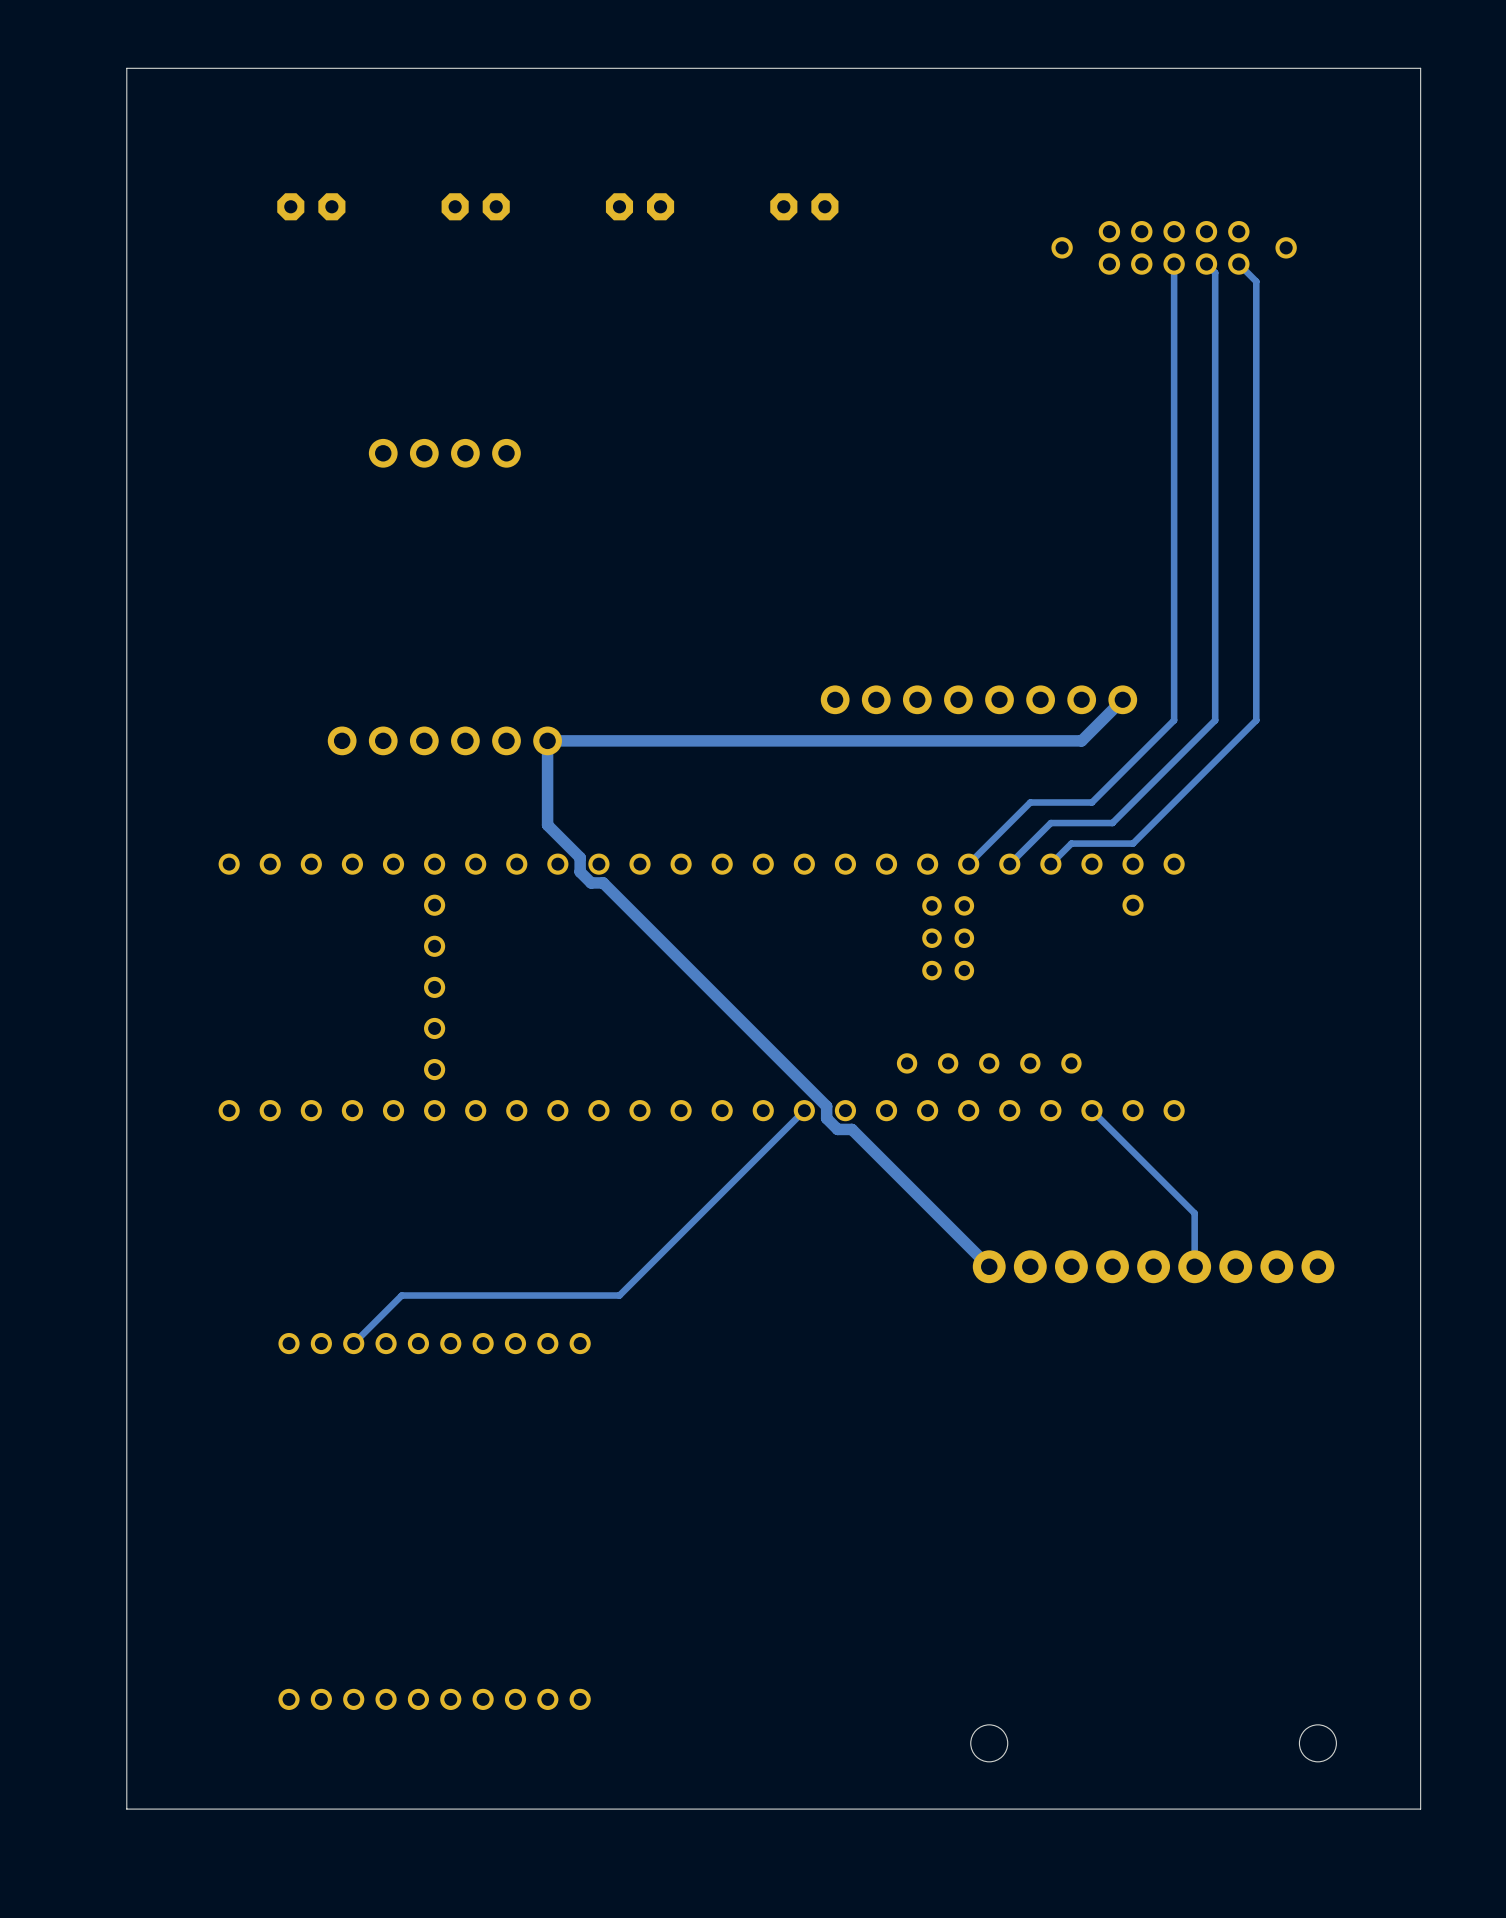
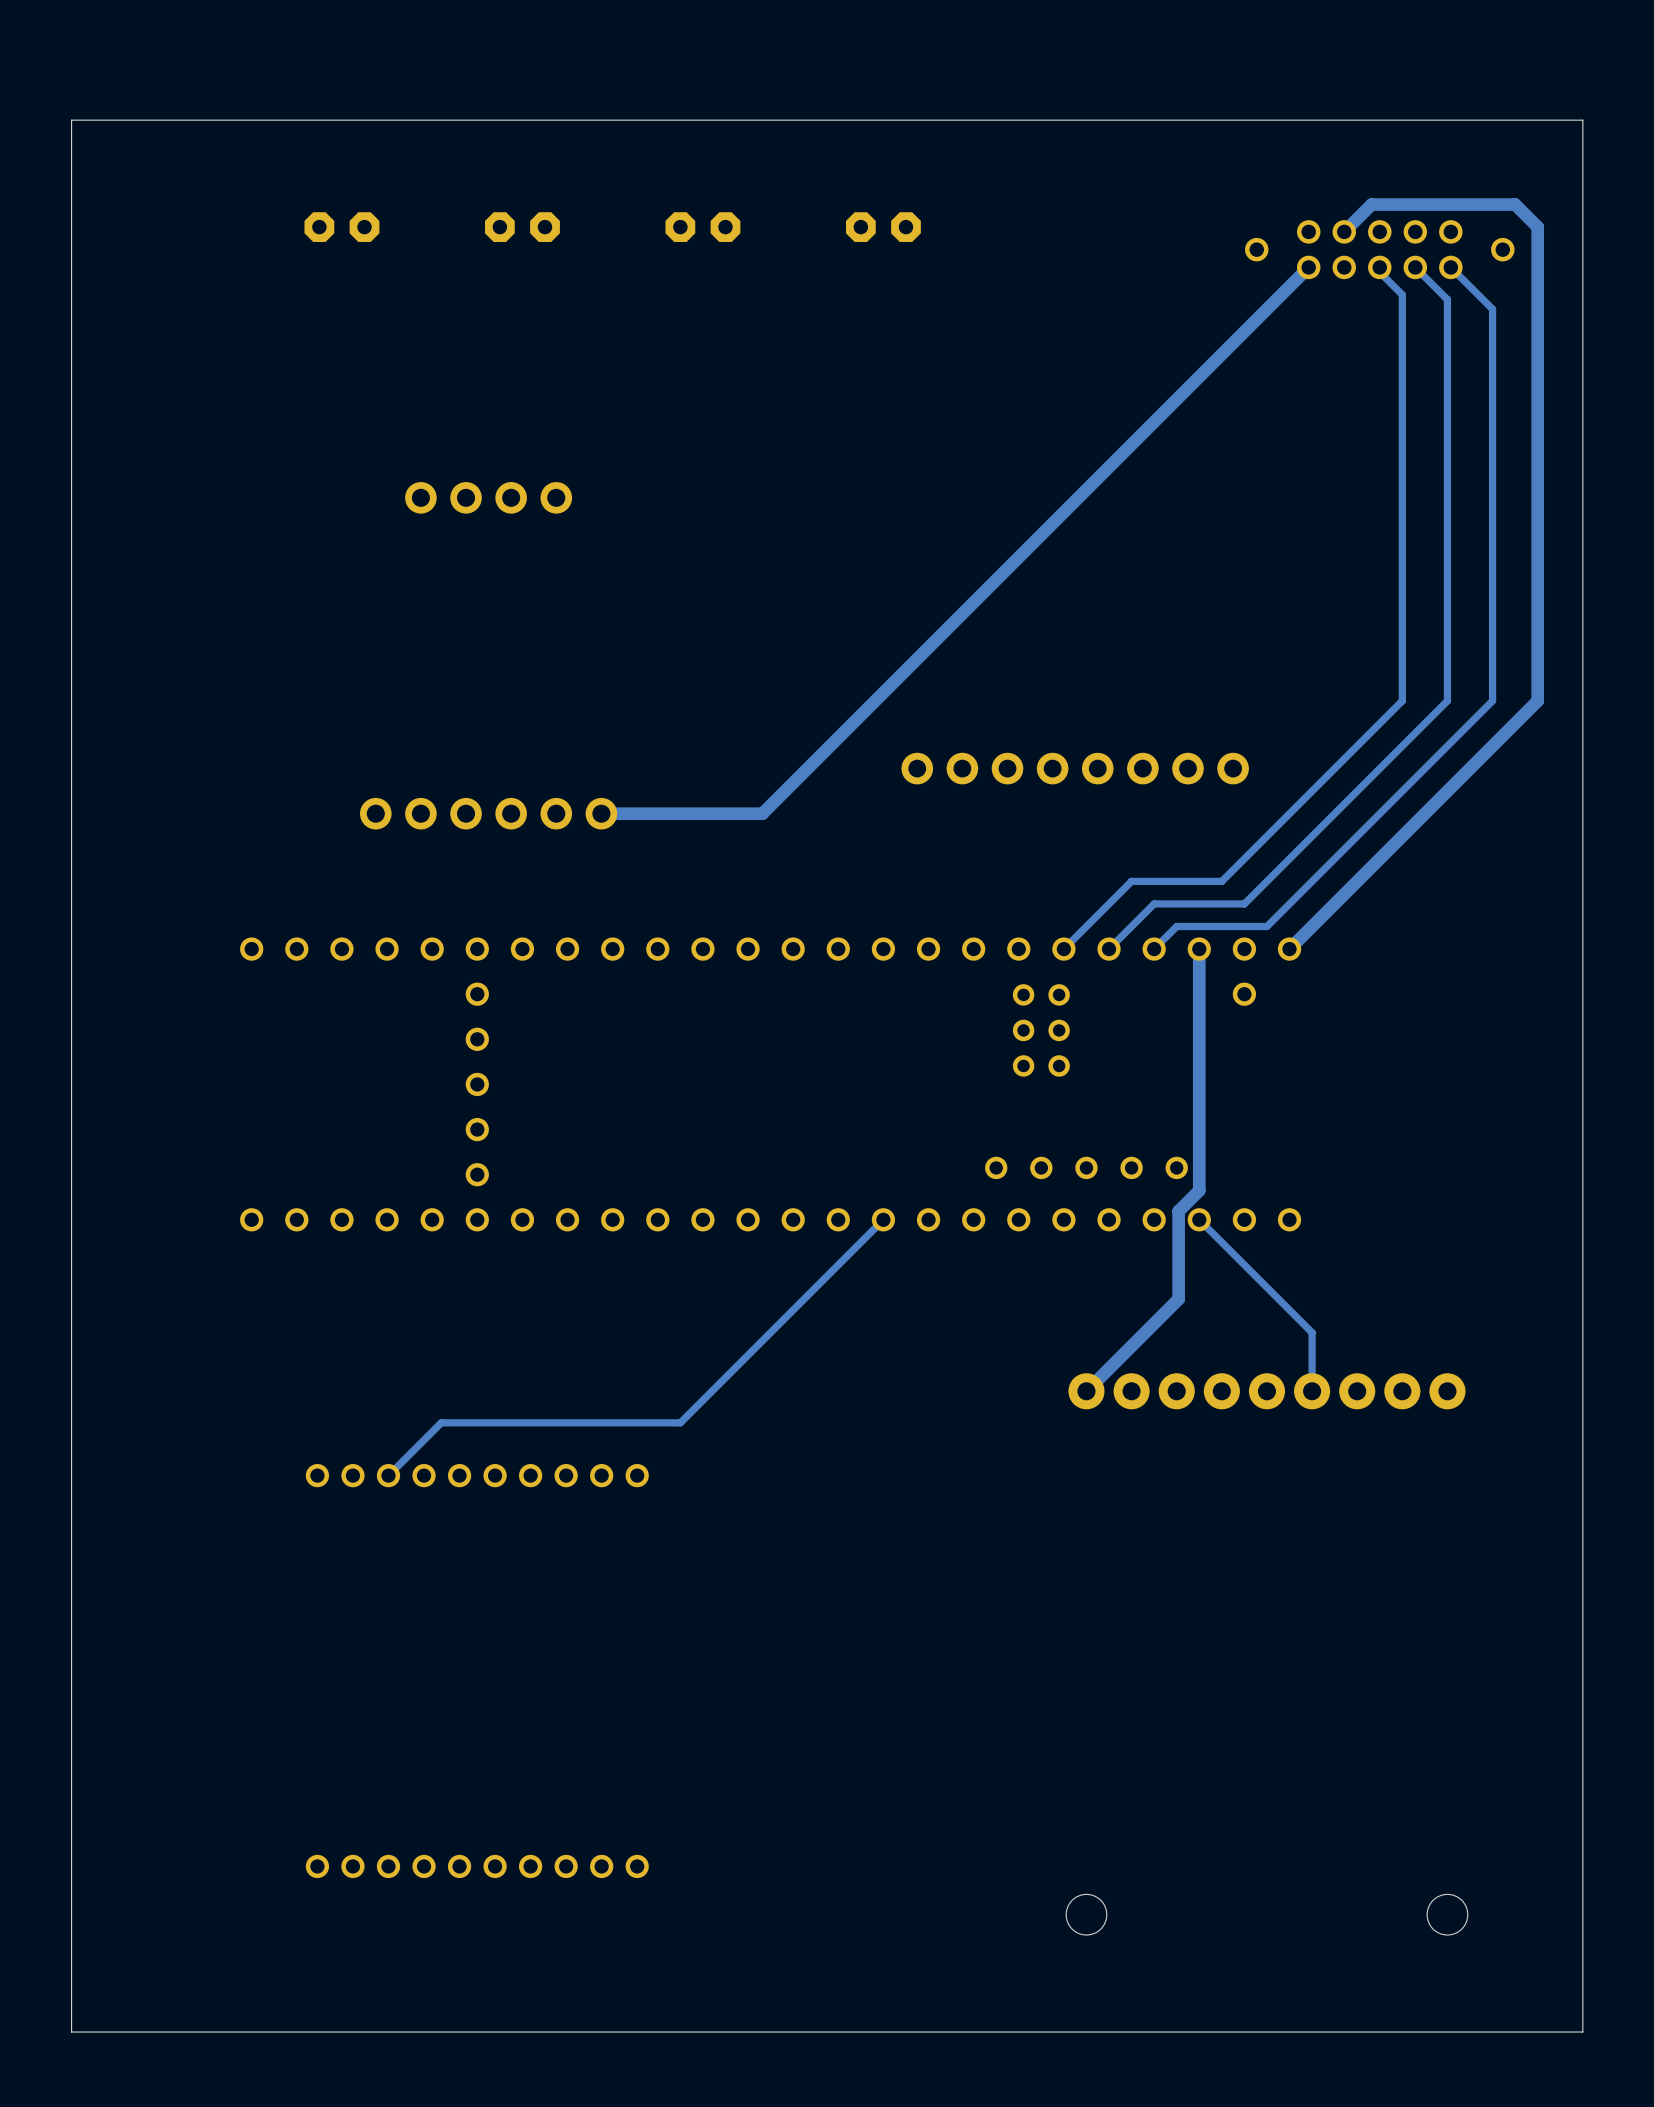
board edge: (1420, 68) (126, 68) (126, 1809) (1420, 1809) (1420, 68) -> (1582, 120) (1582, 2032) (71, 2032) (71, 120) (1582, 120)
track: none -> (1344, 231) (1371, 204) (1515, 204) (1537, 227) (1537, 700) (1289, 949)
part position: (1174, 247) -> (1379, 249)
track: (1174, 264) (1174, 720) (1091, 802) -> (1379, 267) (1379, 272) (1402, 294) (1402, 700) (1221, 881) (1199, 881)
track: (1206, 264) (1215, 272) (1215, 720) (1112, 823) -> (1415, 267) (1447, 299) (1447, 700) (1244, 903) (1221, 903)
track: (1238, 264) (1256, 281) (1256, 720) (1133, 843) -> (1450, 267) (1492, 309) (1492, 700) (1266, 926) (1244, 926)
track: (1122, 699) (1081, 740) (694, 740) -> (1308, 267) (762, 813)
track: (547, 740) (547, 825) (580, 857) (580, 871) (591, 882) (603, 882) (826, 1106) (826, 1118) (837, 1129) (851, 1129) (989, 1266) -> (1199, 949) (1199, 1190) (1178, 1211) (1178, 1299) (1086, 1391)

